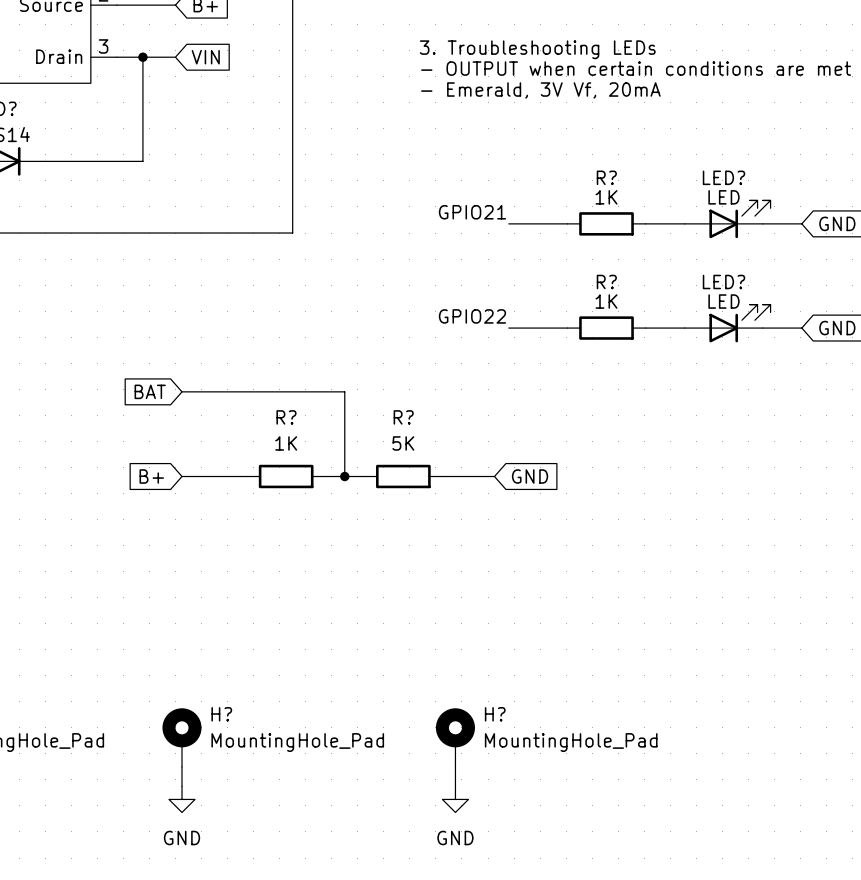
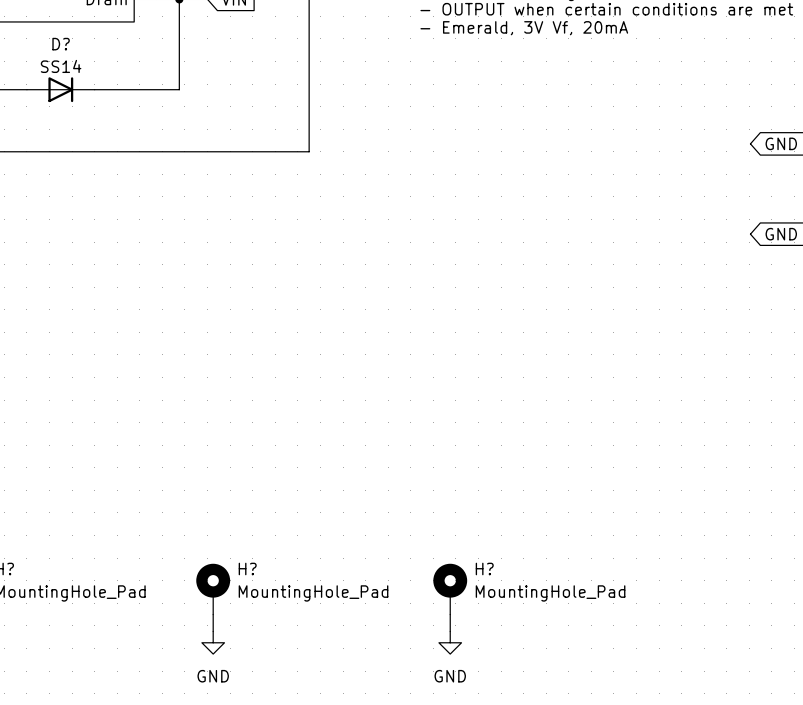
label: GPIO21 (472, 212) -> none
LED?: LED (727, 219) -> none
wire: (508, 223) (567, 223) -> none
R?: 1K (606, 223) -> none
wire: (645, 223) (684, 223) -> none
wire: (762, 223) (801, 223) -> none
label: GPIO22 (472, 316) -> none
LED?: LED (727, 323) -> none
wire: (508, 328) (567, 328) -> none
R?: 1K (606, 328) -> none
wire: (645, 328) (684, 328) -> none
wire: (762, 328) (801, 328) -> none
global label: BAT (150, 391) -> none
wire: (182, 391) (344, 391) (344, 476) -> none
global label: B+ (151, 476) -> none
wire: (182, 476) (247, 476) -> none
R?: 1K (286, 476) -> none
wire: (325, 476) (364, 476) -> none
junction: (344, 476) -> none
R?: 5K (403, 476) -> none
wire: (442, 476) (494, 476) -> none
global label: GND (530, 476) -> none

